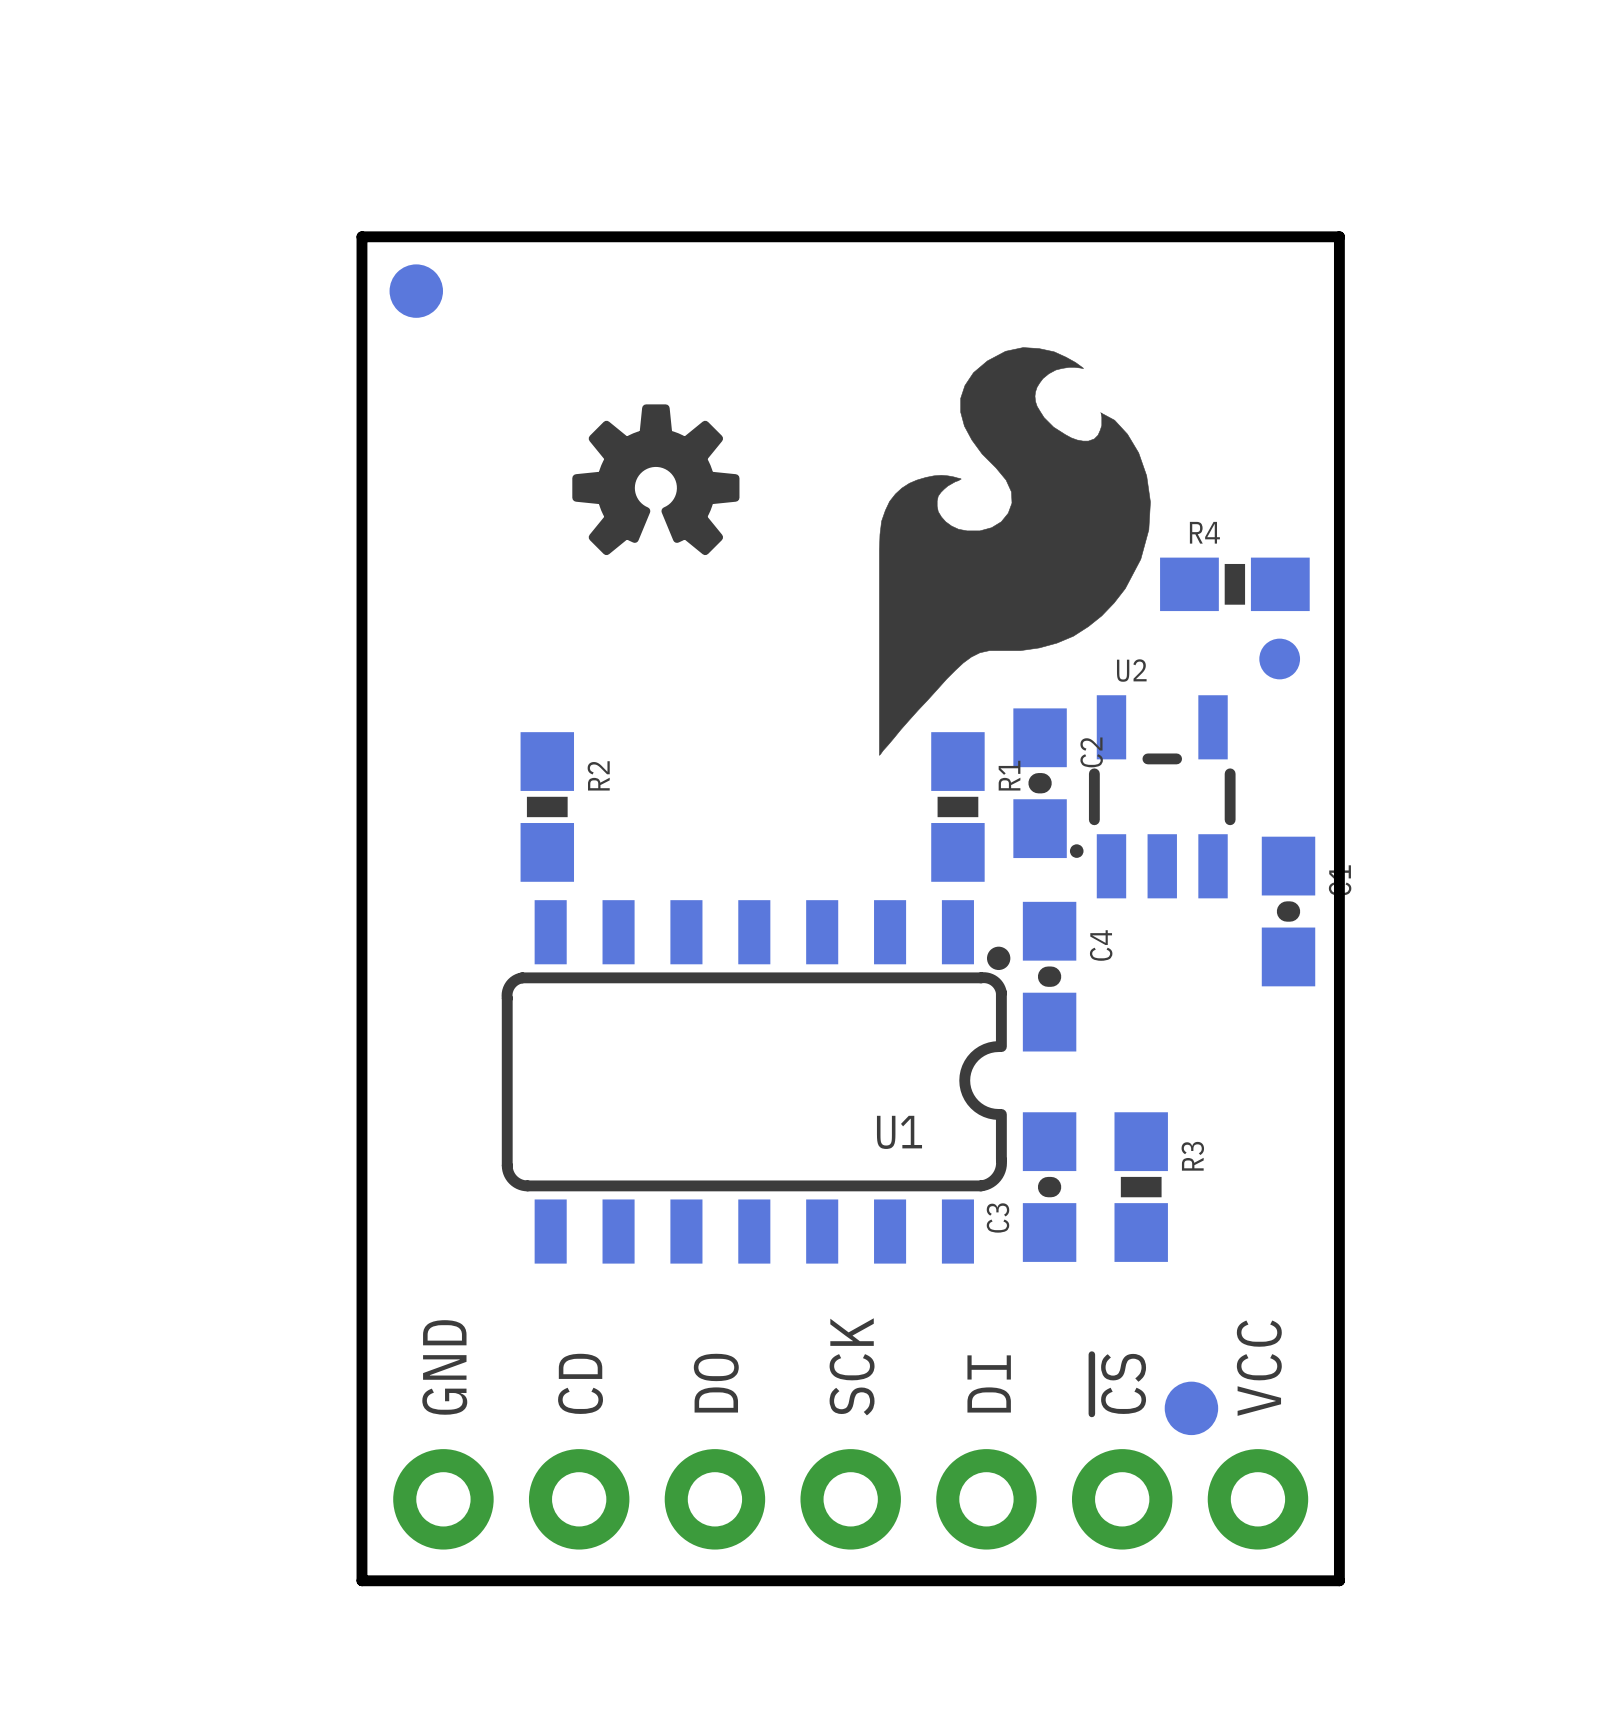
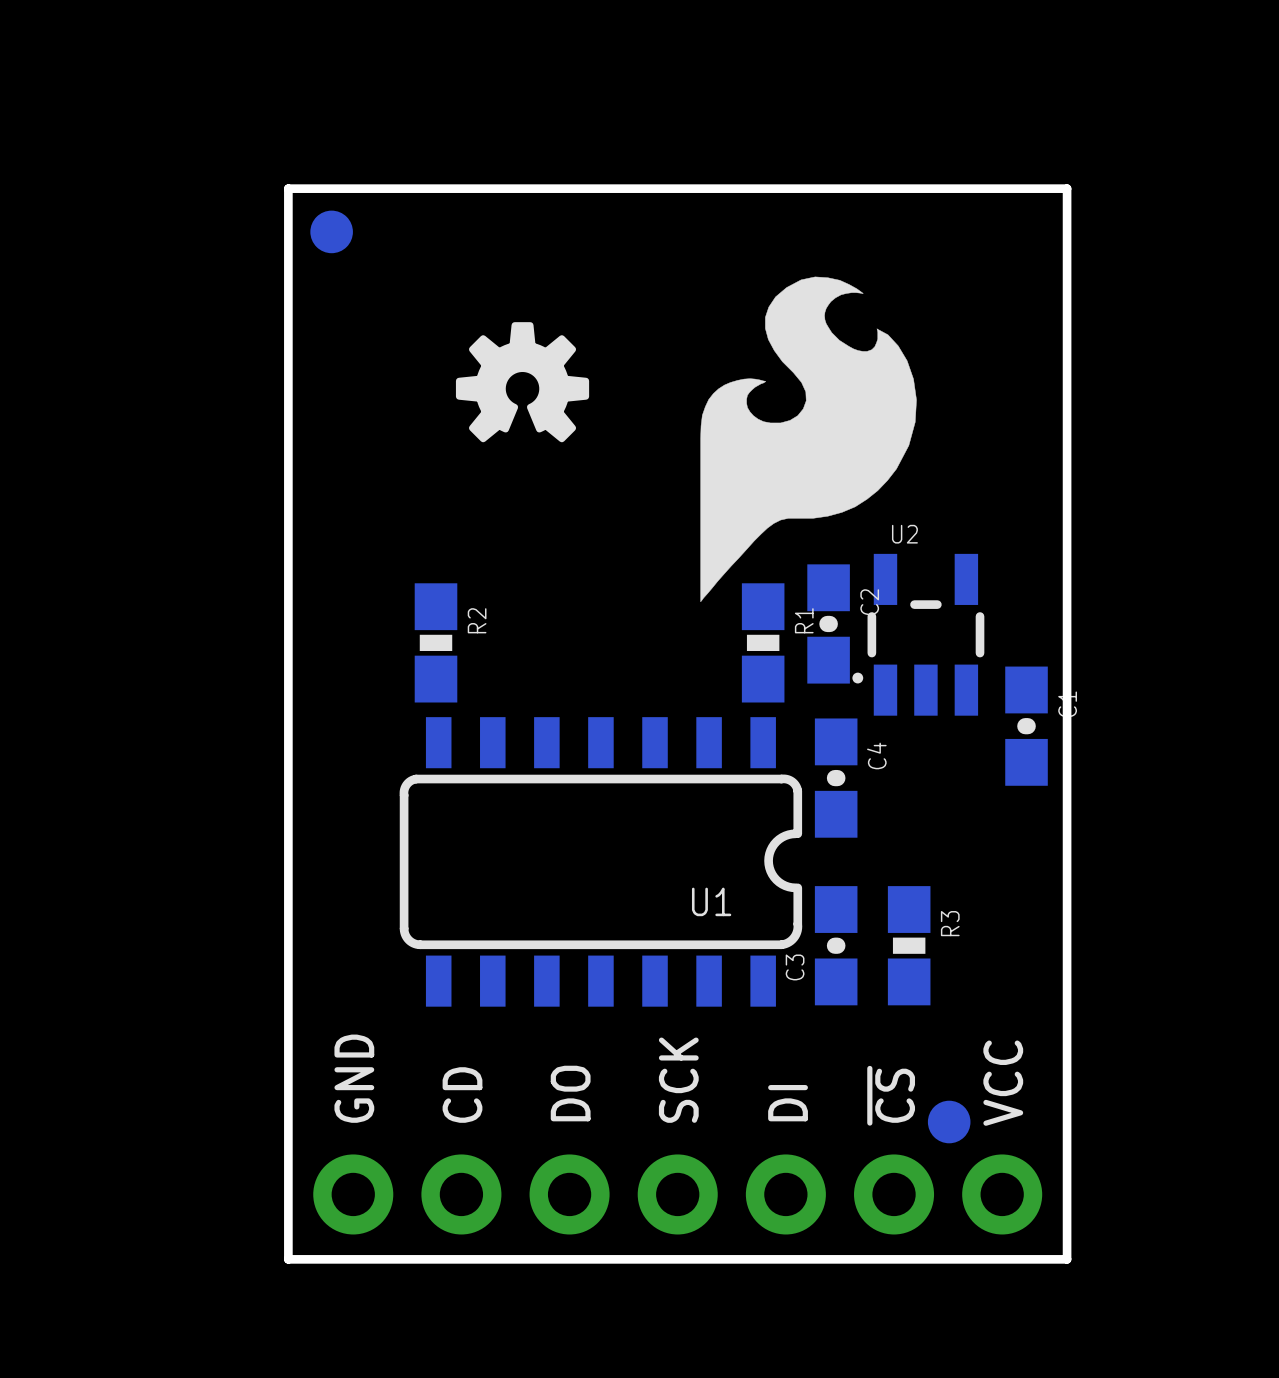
R4: (1234, 584) -> none
part: (1279, 659) -> none
U1 footprint: [501, 900, 1011, 1264] -> [399, 717, 803, 1007]

